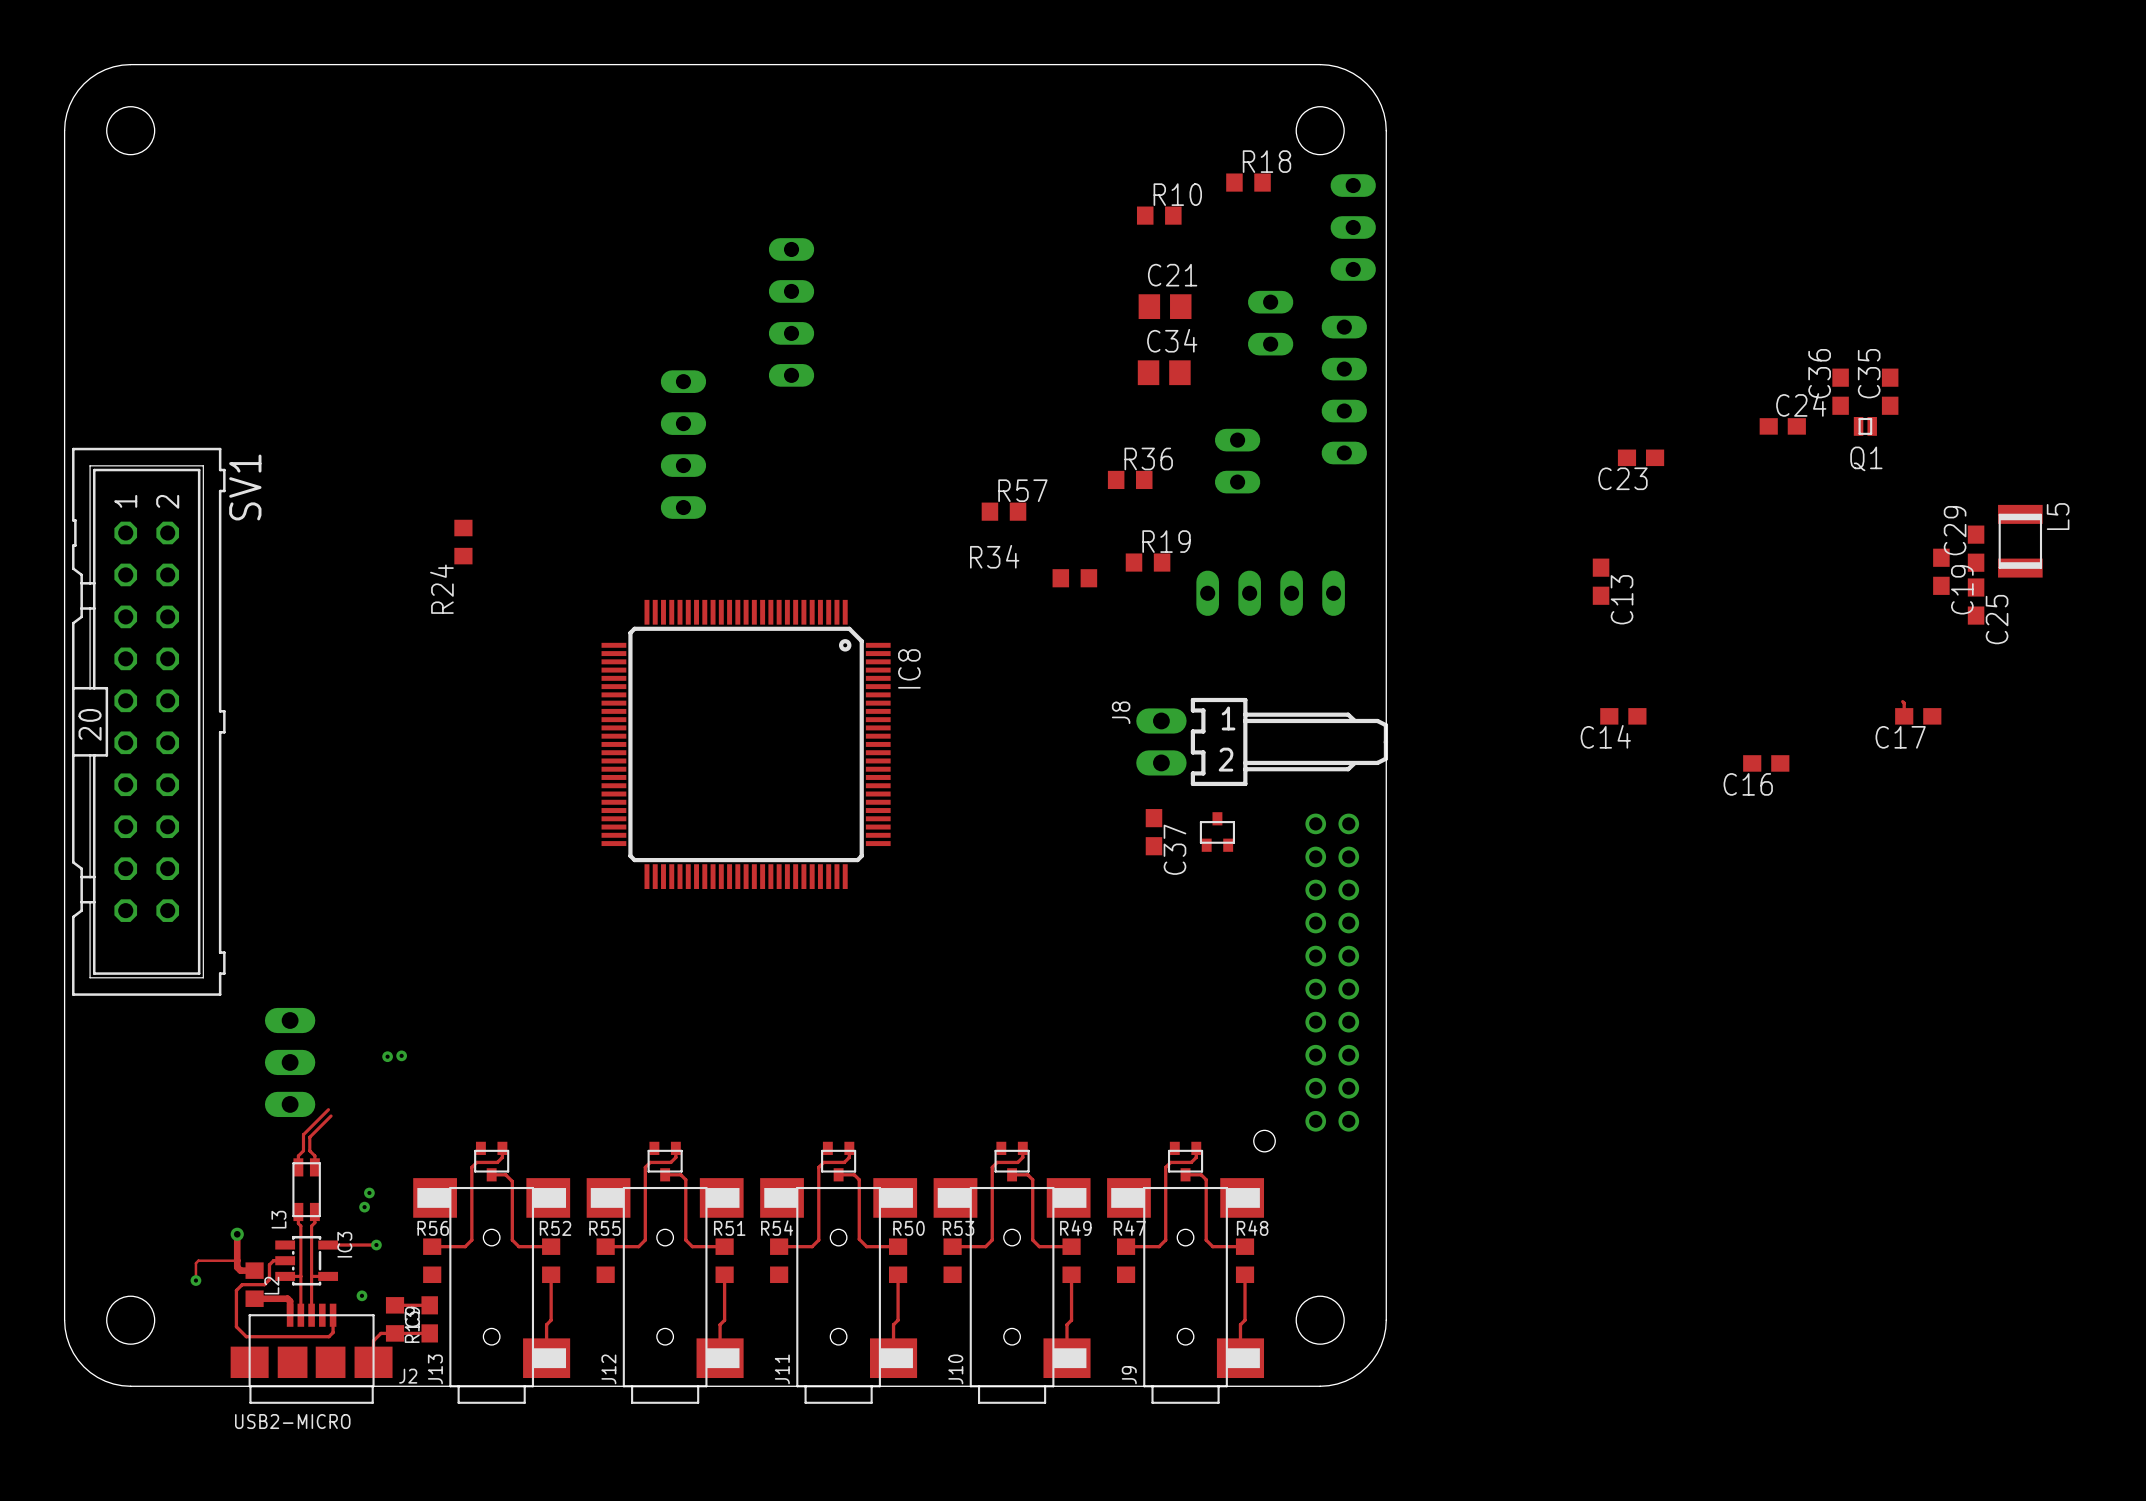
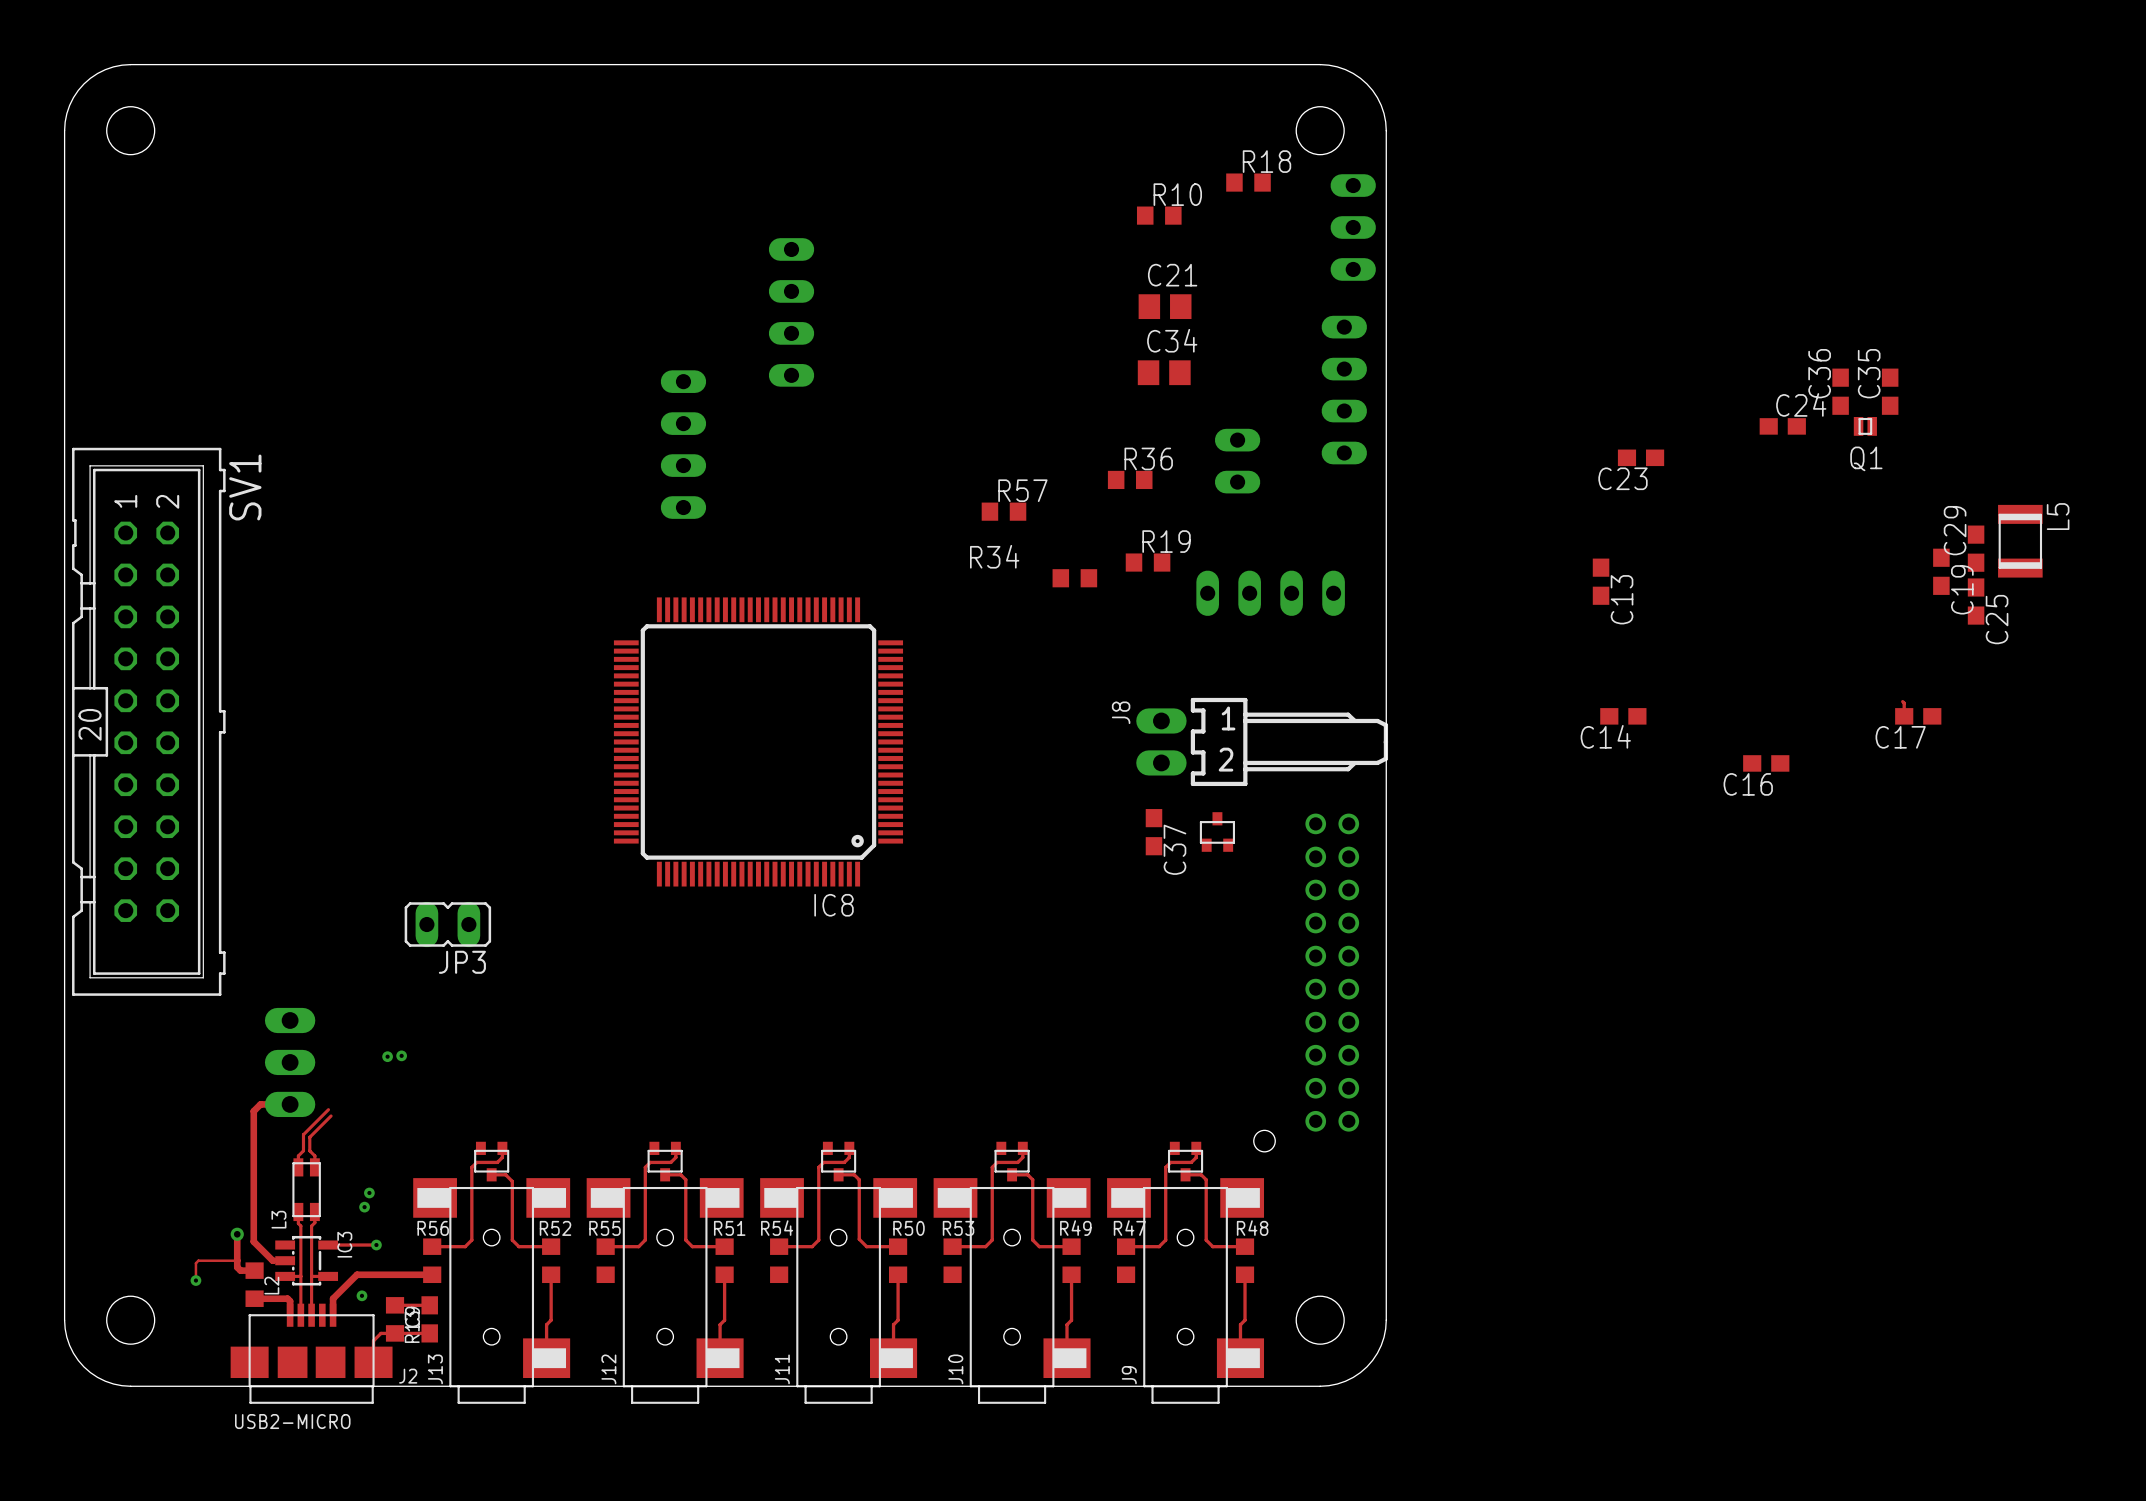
part: (1270, 323) -> none
R24: (463, 542) -> none
IC8 rotation: 0° (746, 744) -> 90° clockwise (758, 741)
JP3: none -> (447, 924)
track: none -> (290, 1104) (260, 1104) (253, 1111) (253, 1241) (273, 1260)
track: (273, 1260) (269, 1264) (269, 1279) (264, 1284) (242, 1284) (236, 1290) (236, 1326) (246, 1336) (328, 1336) (333, 1332) (333, 1315) -> (432, 1274) (357, 1274) (333, 1298) (333, 1315)

